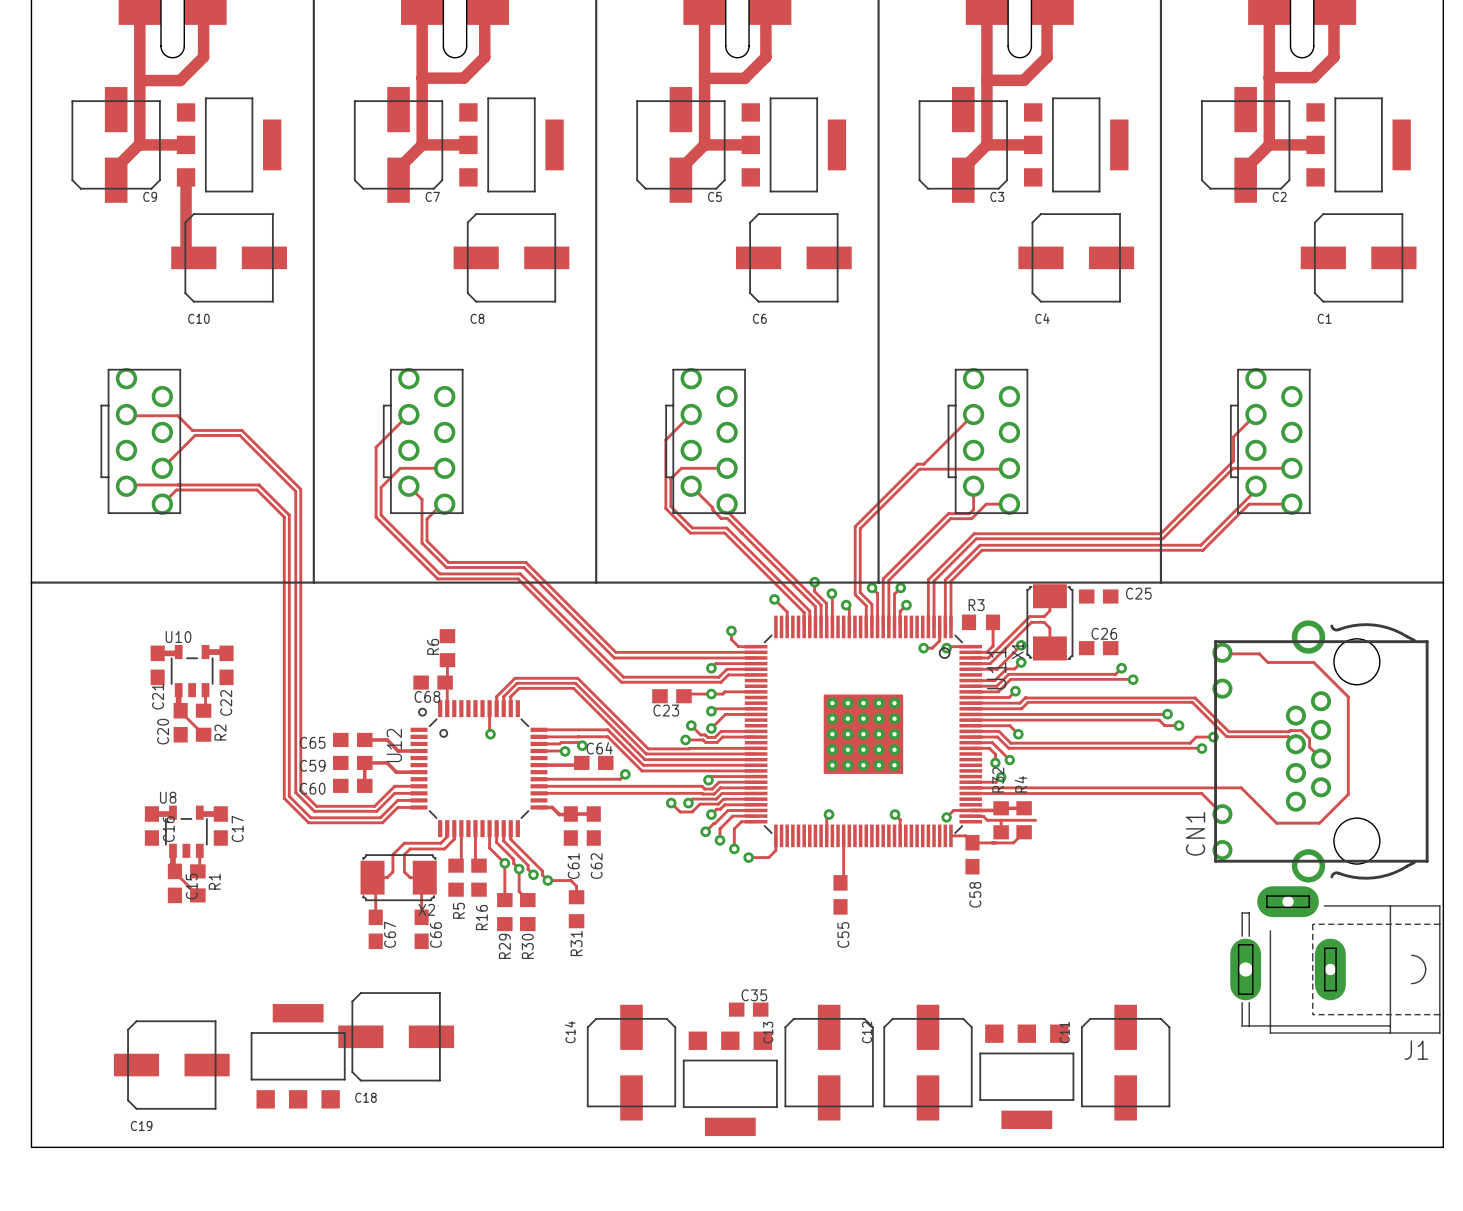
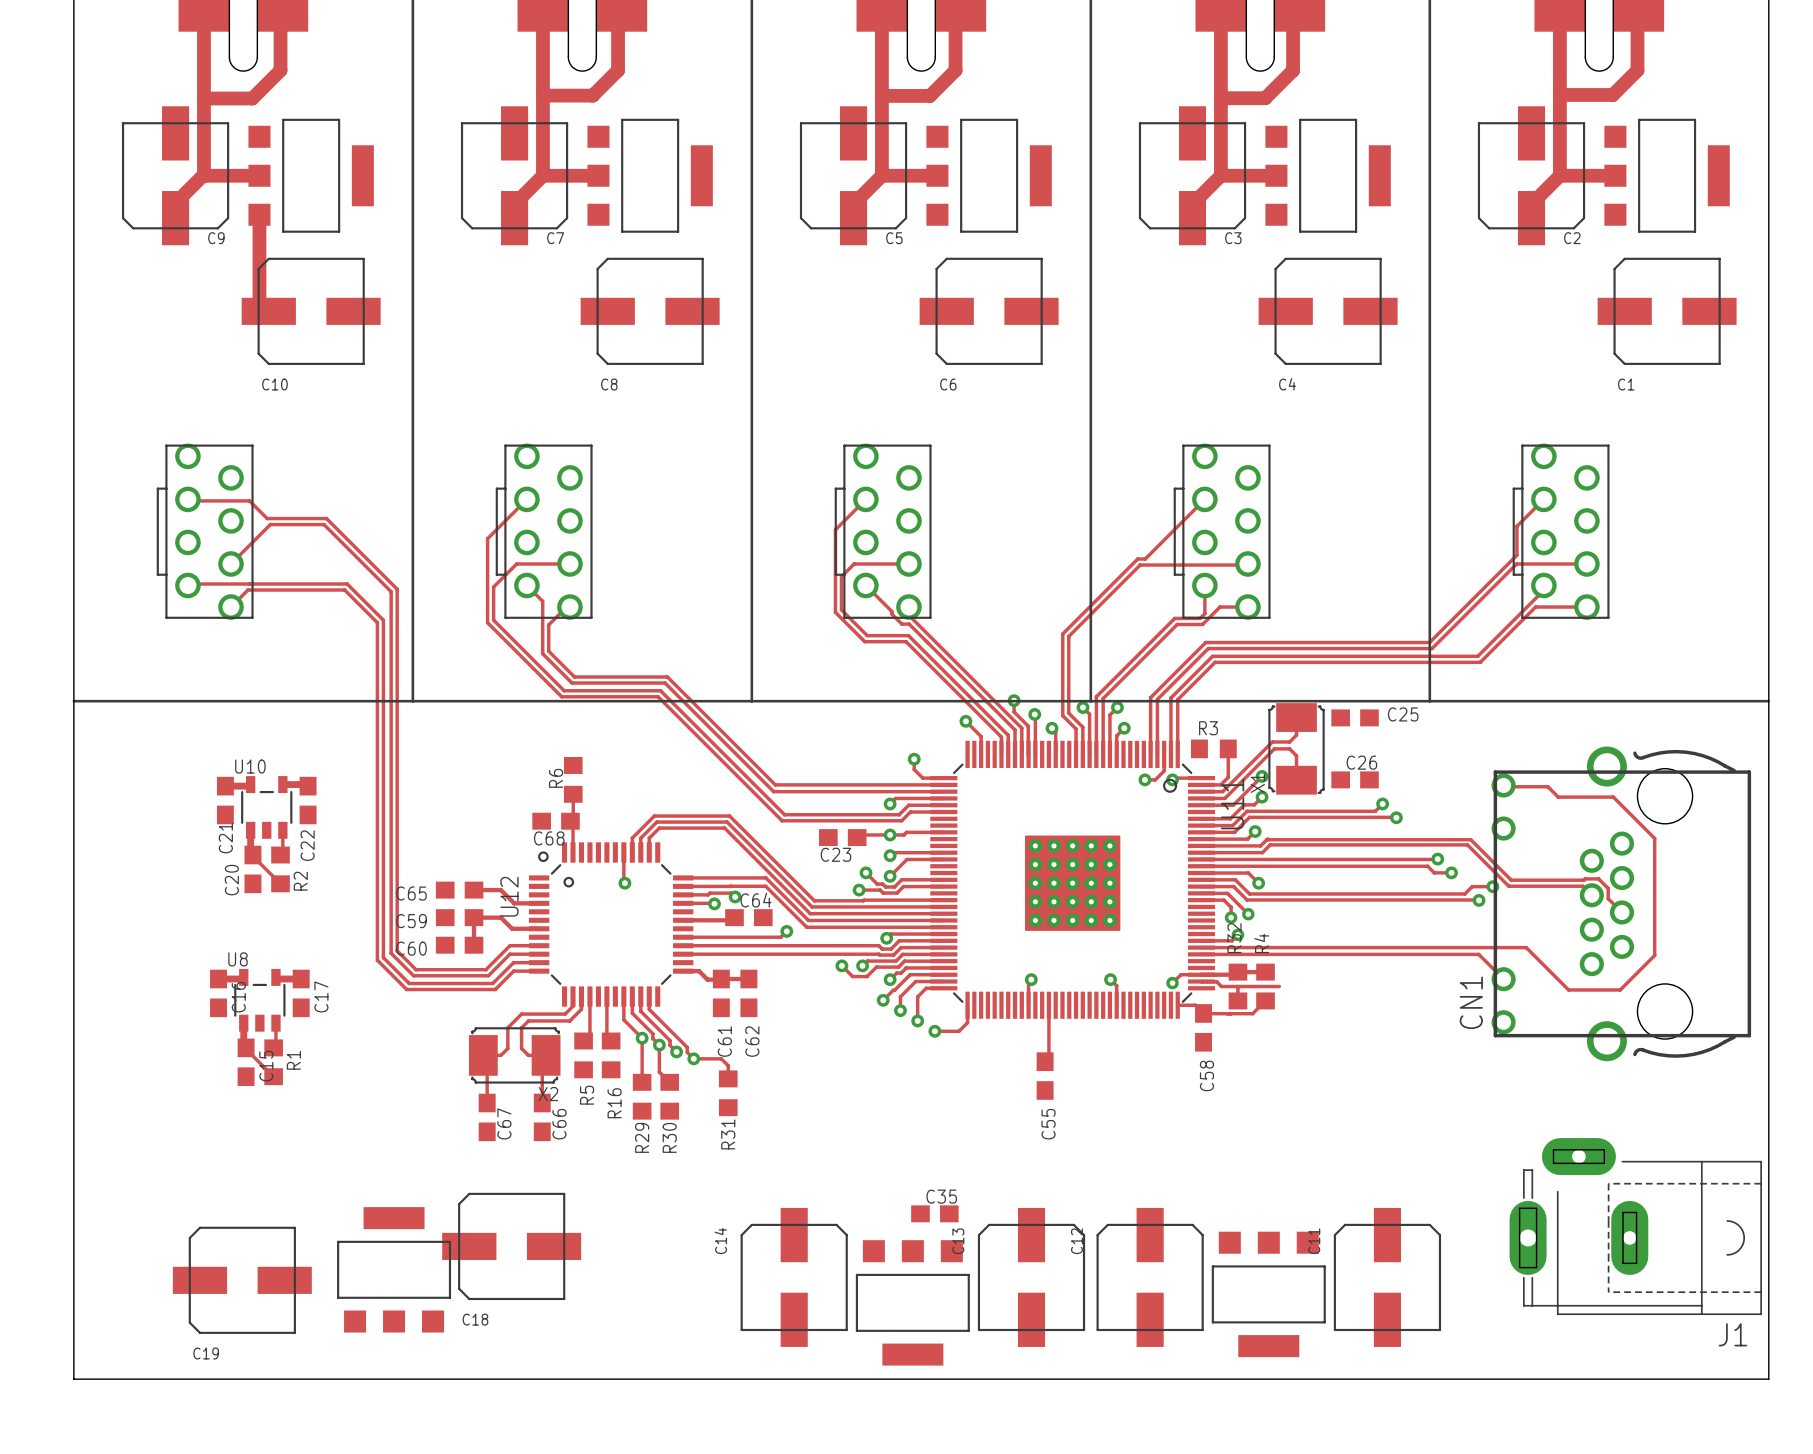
J1 position: (1335, 960) -> (1635, 1226)

